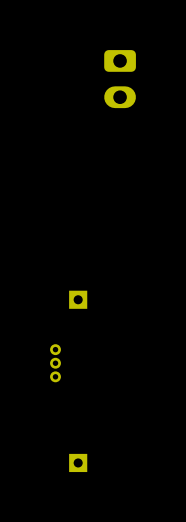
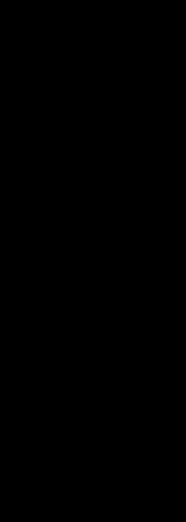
part: (120, 79) -> none
part: (78, 299) -> none
part: (55, 363) -> none
part: (78, 462) -> none

